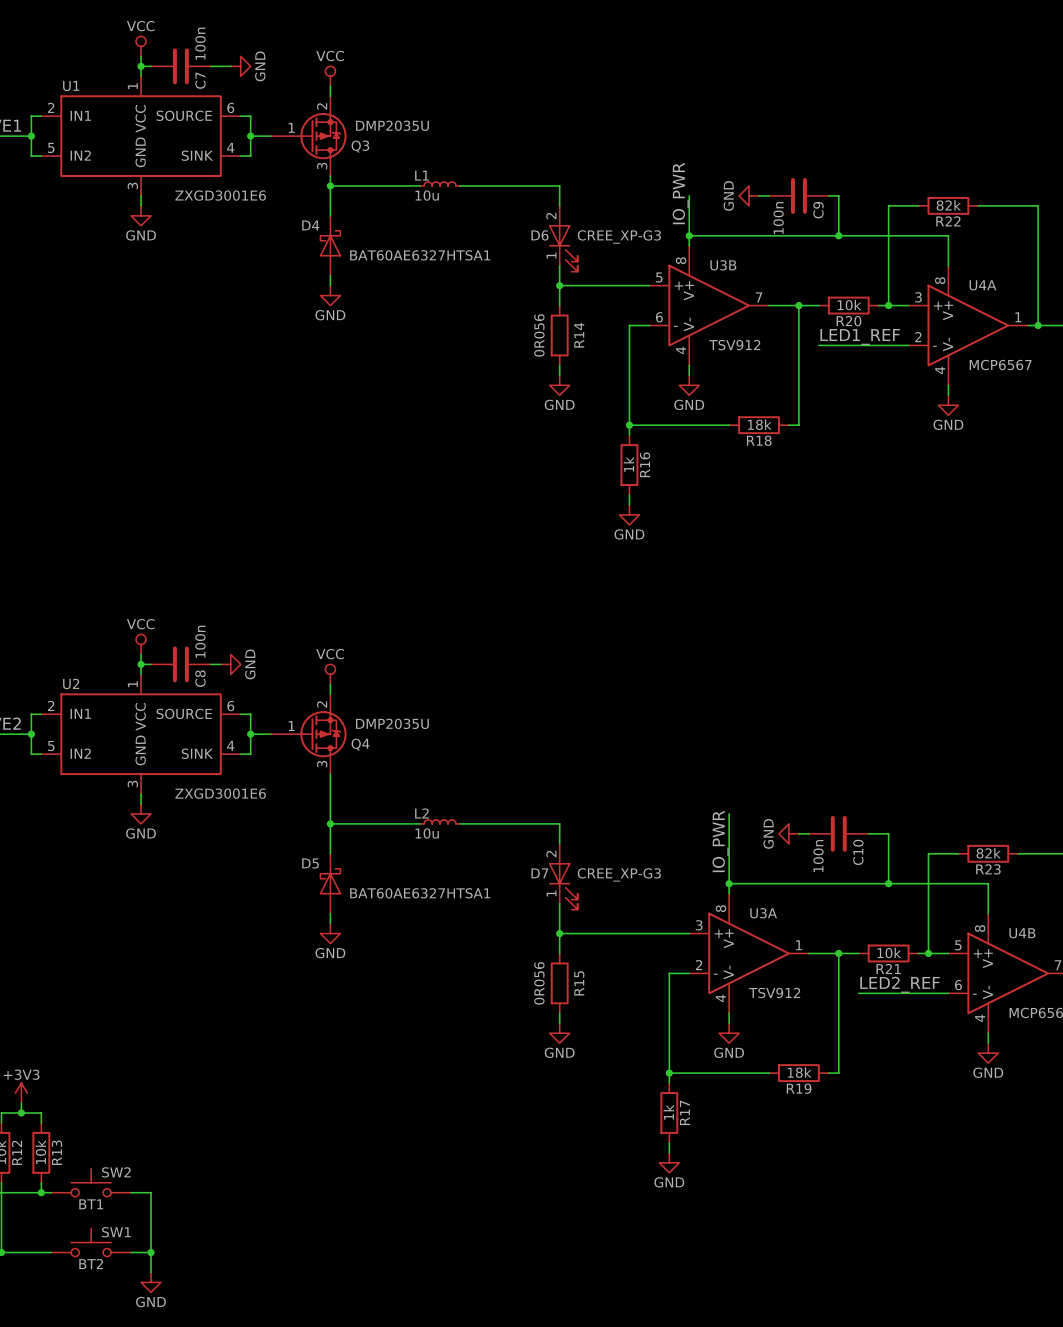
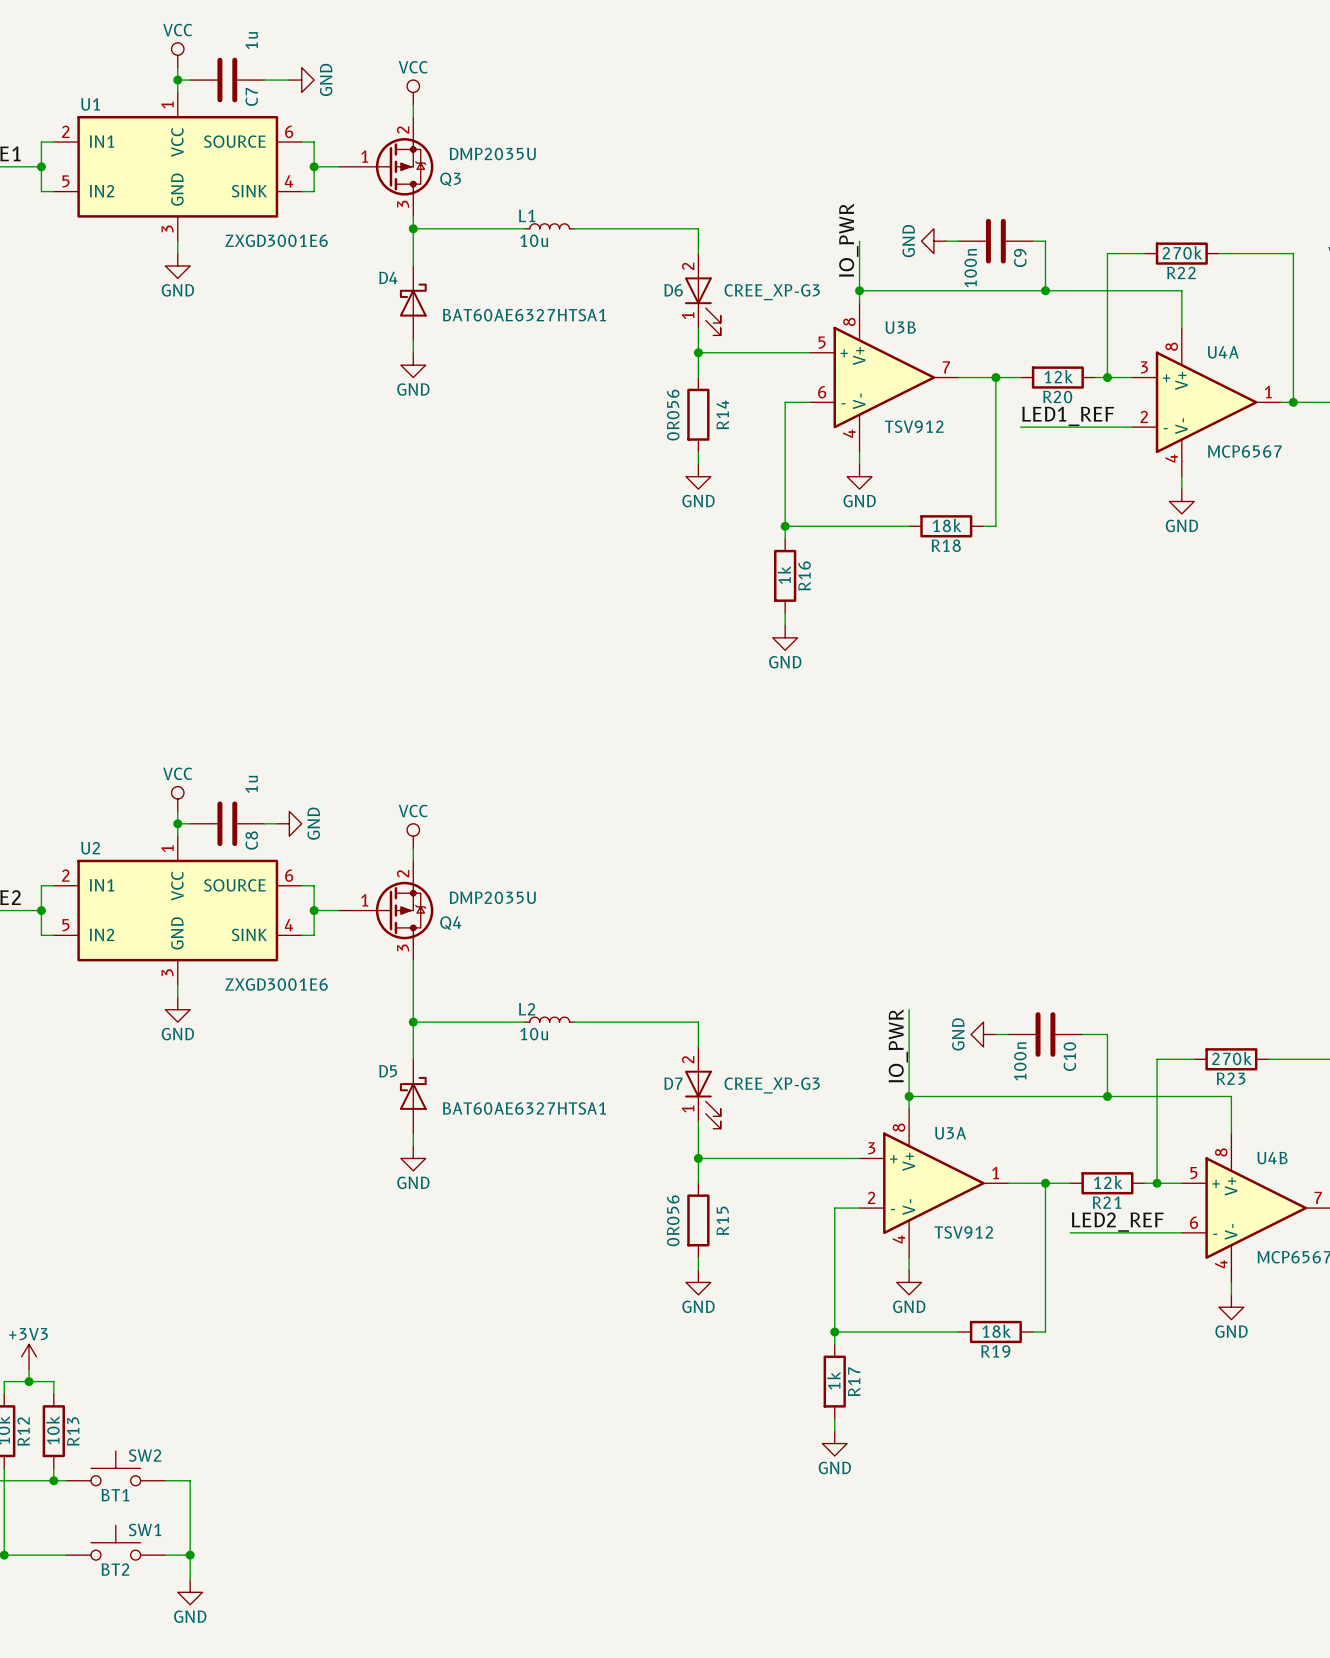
C7 value: 100n (200, 43) -> 1u (251, 40)
R22 value: 82k (948, 205) -> 270k (1182, 252)
R20 value: 10k (849, 305) -> 12k (1058, 376)
C8 value: 100n (200, 641) -> 1u (251, 784)
R23 value: 82k (988, 853) -> 270k (1232, 1058)
R21 value: 10k (889, 953) -> 12k (1108, 1182)

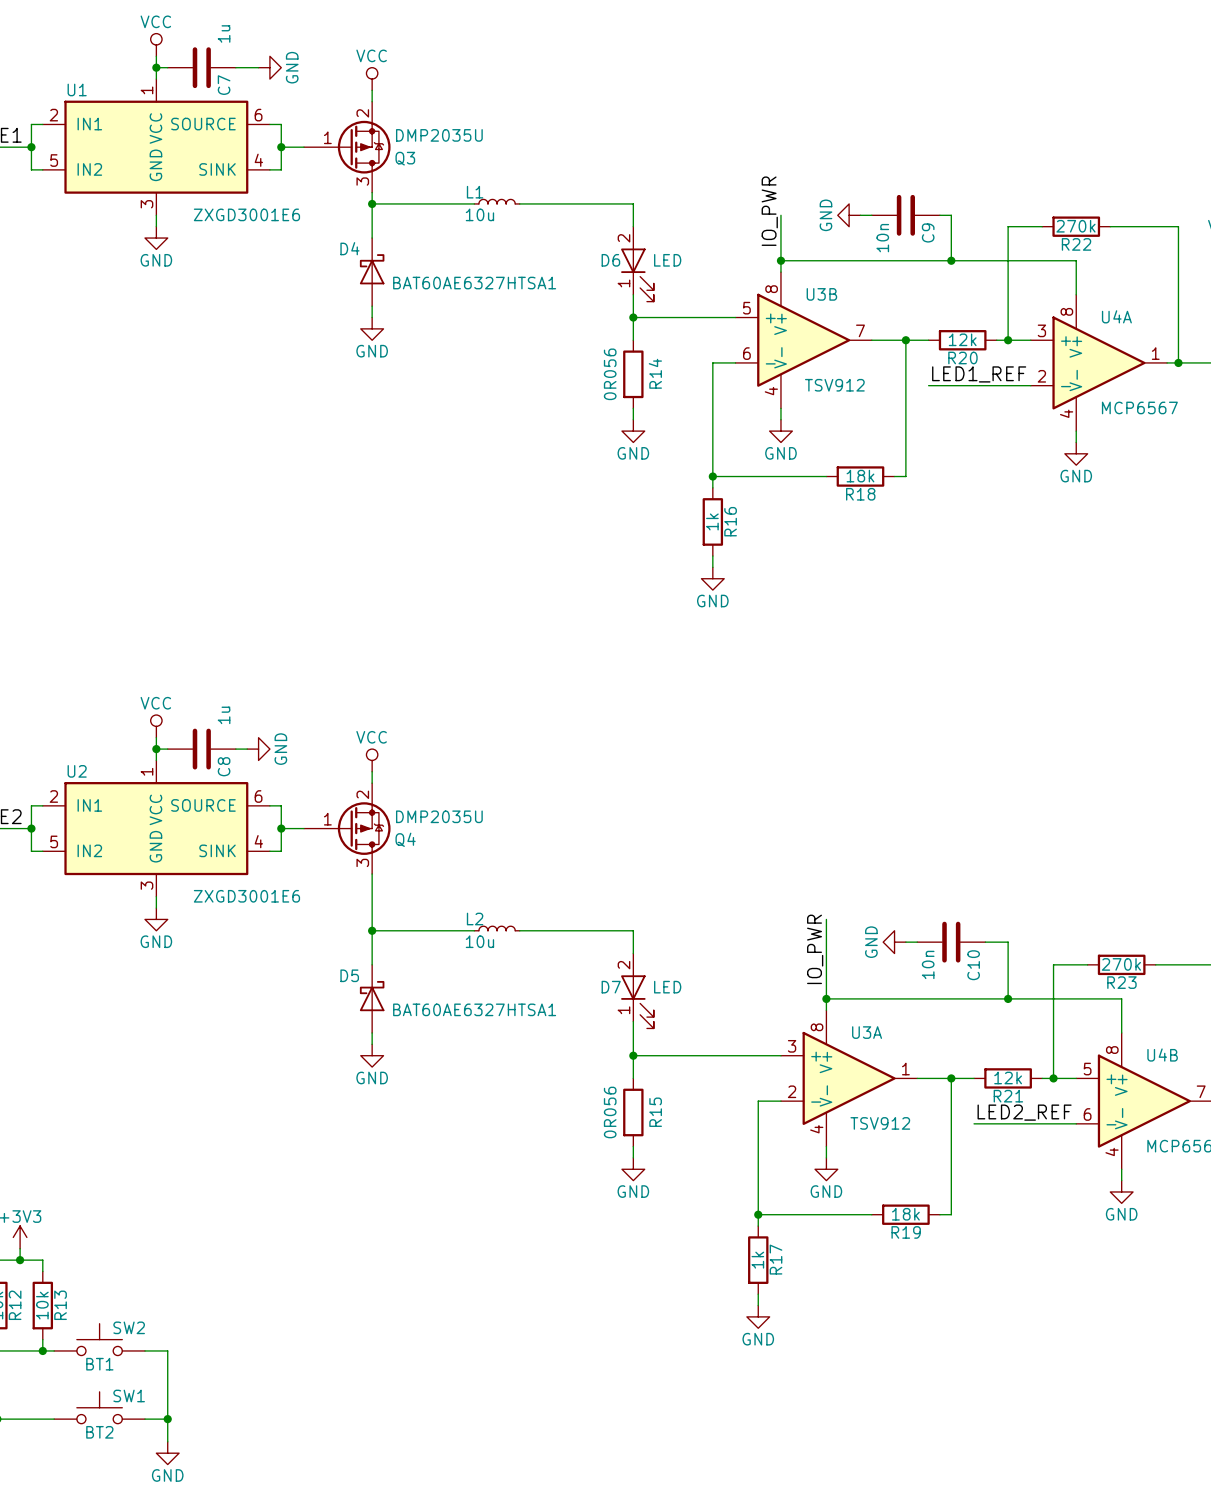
C9 value: 100n (970, 268) -> 10n (882, 238)
D6 value: CREE_XP-G3 (772, 292) -> LED (667, 260)
C10 value: 100n (1020, 1061) -> 10n (928, 964)
D7 value: CREE_XP-G3 (772, 1085) -> LED (667, 987)

